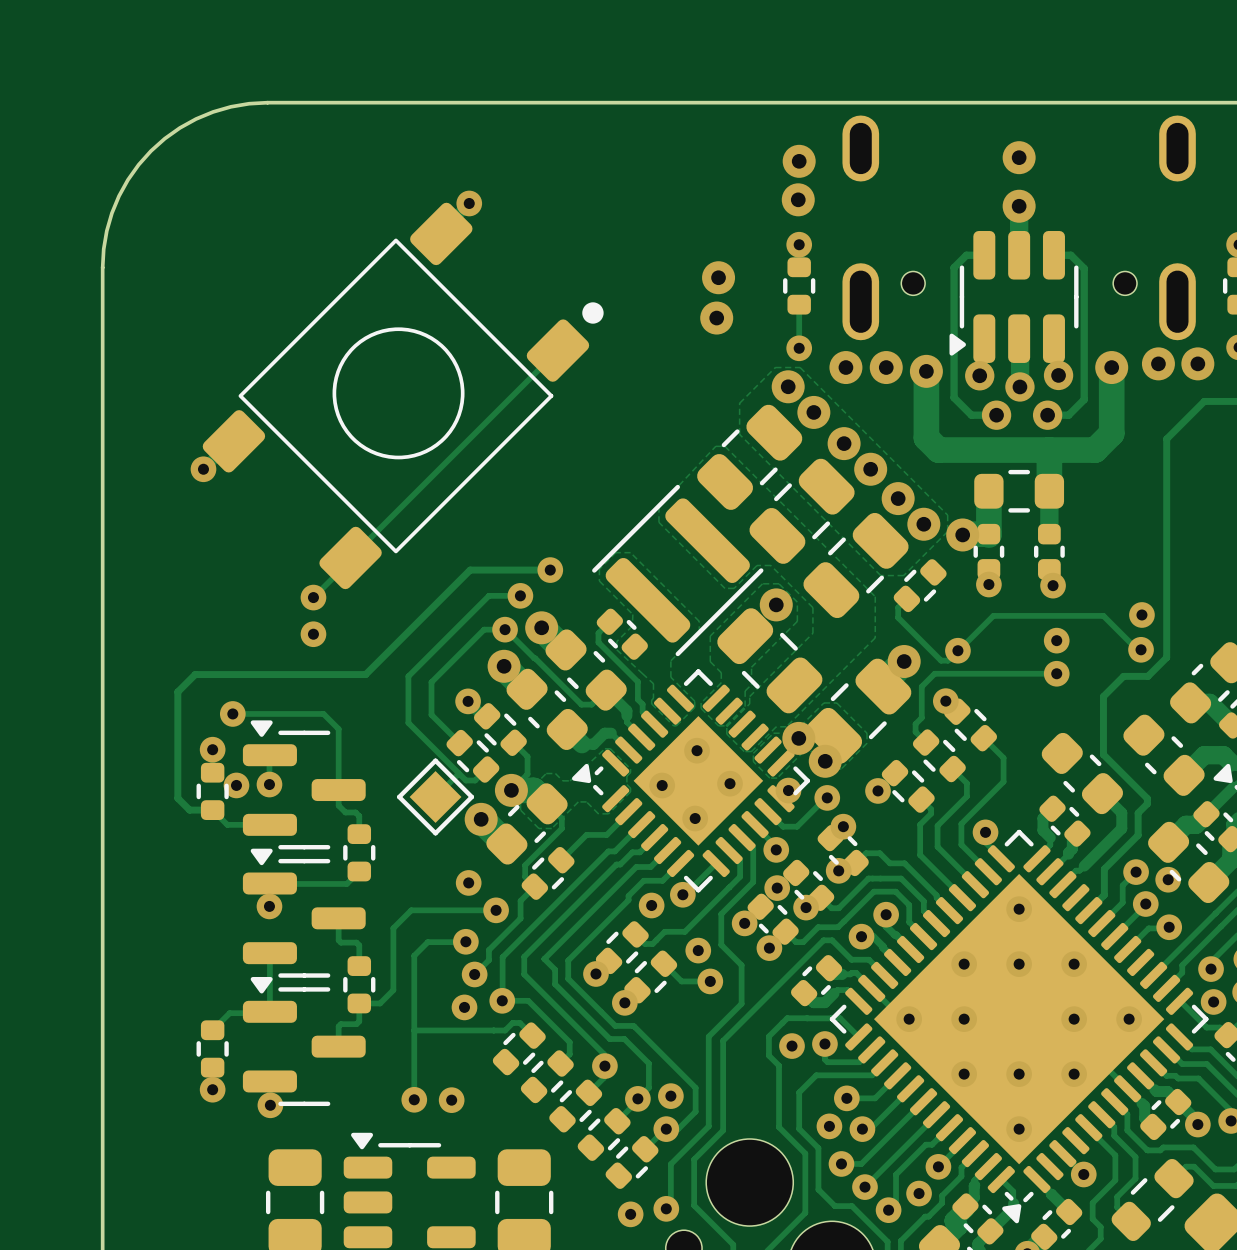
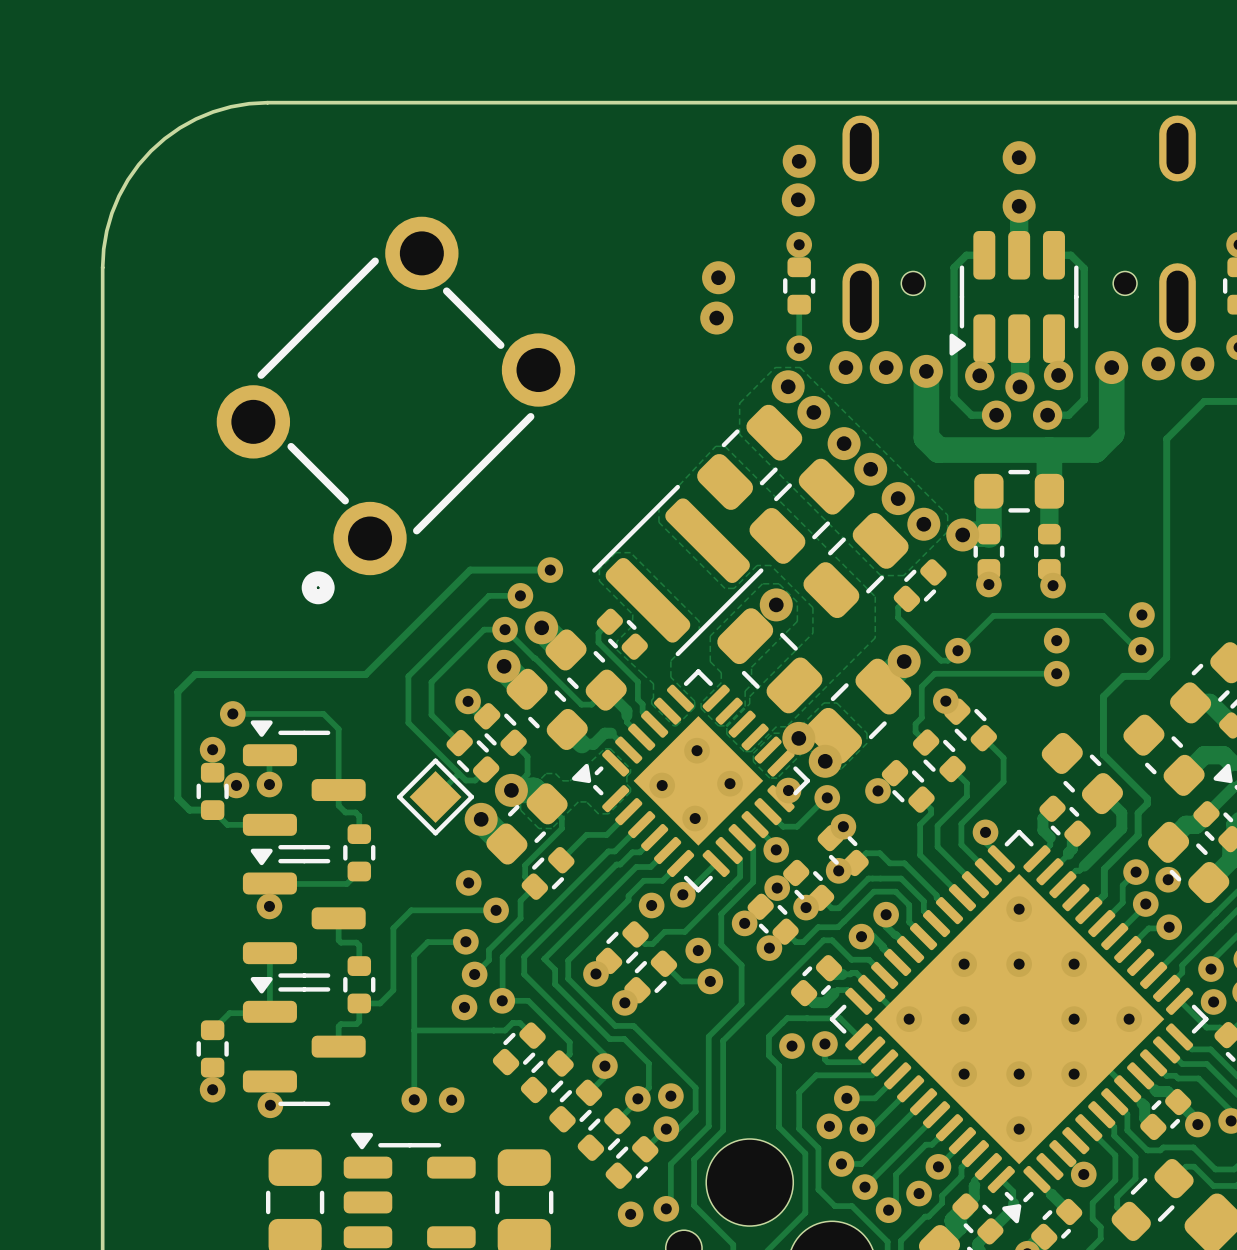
part footprint: [202, 202, 604, 590] -> [216, 216, 576, 605]
via: (469, 203) -> none
track: (557, 350) (313, 597) -> none
via: (203, 469) -> none
via: (313, 597) -> none
via: (313, 634) -> none

